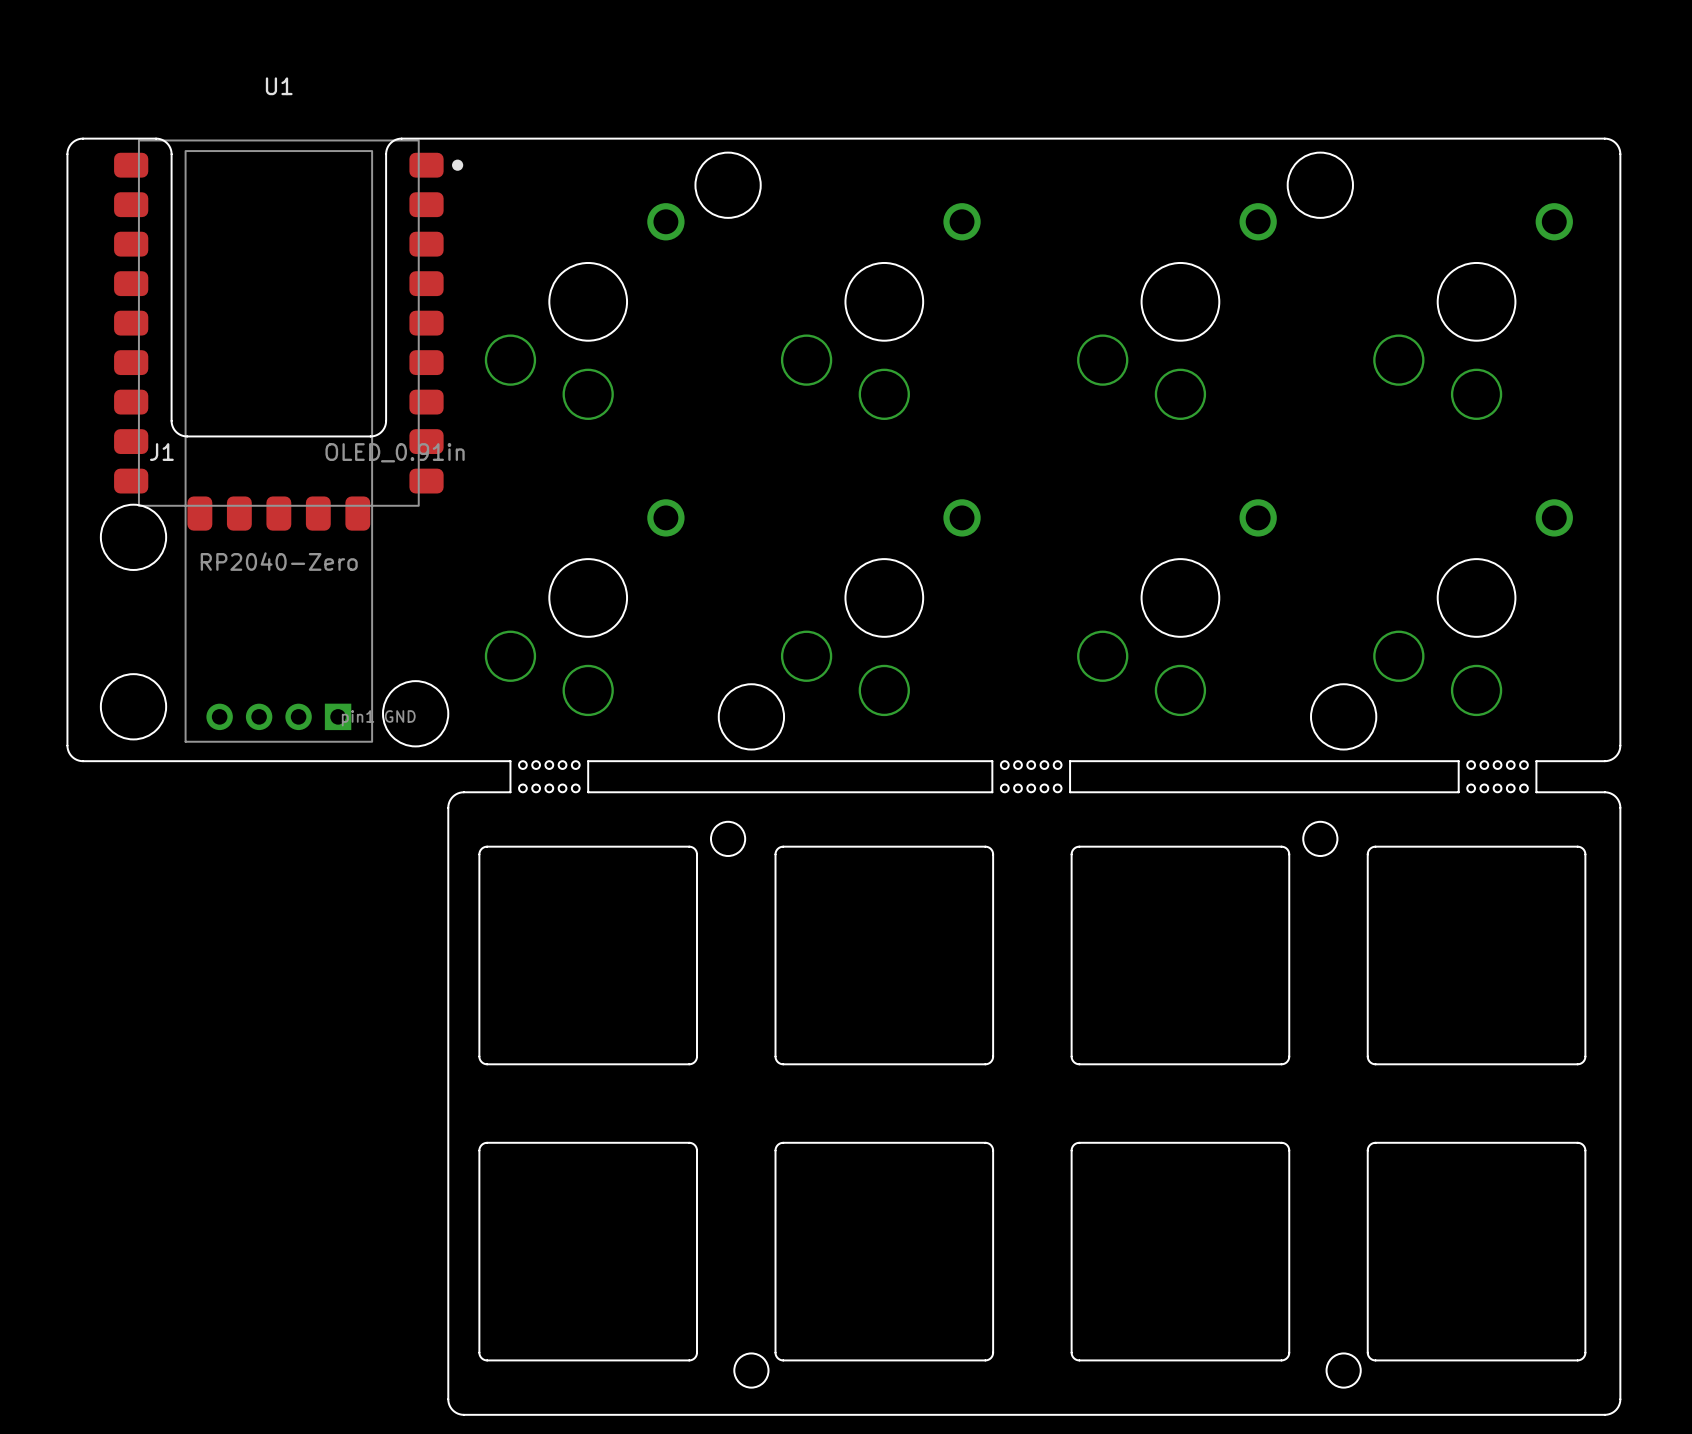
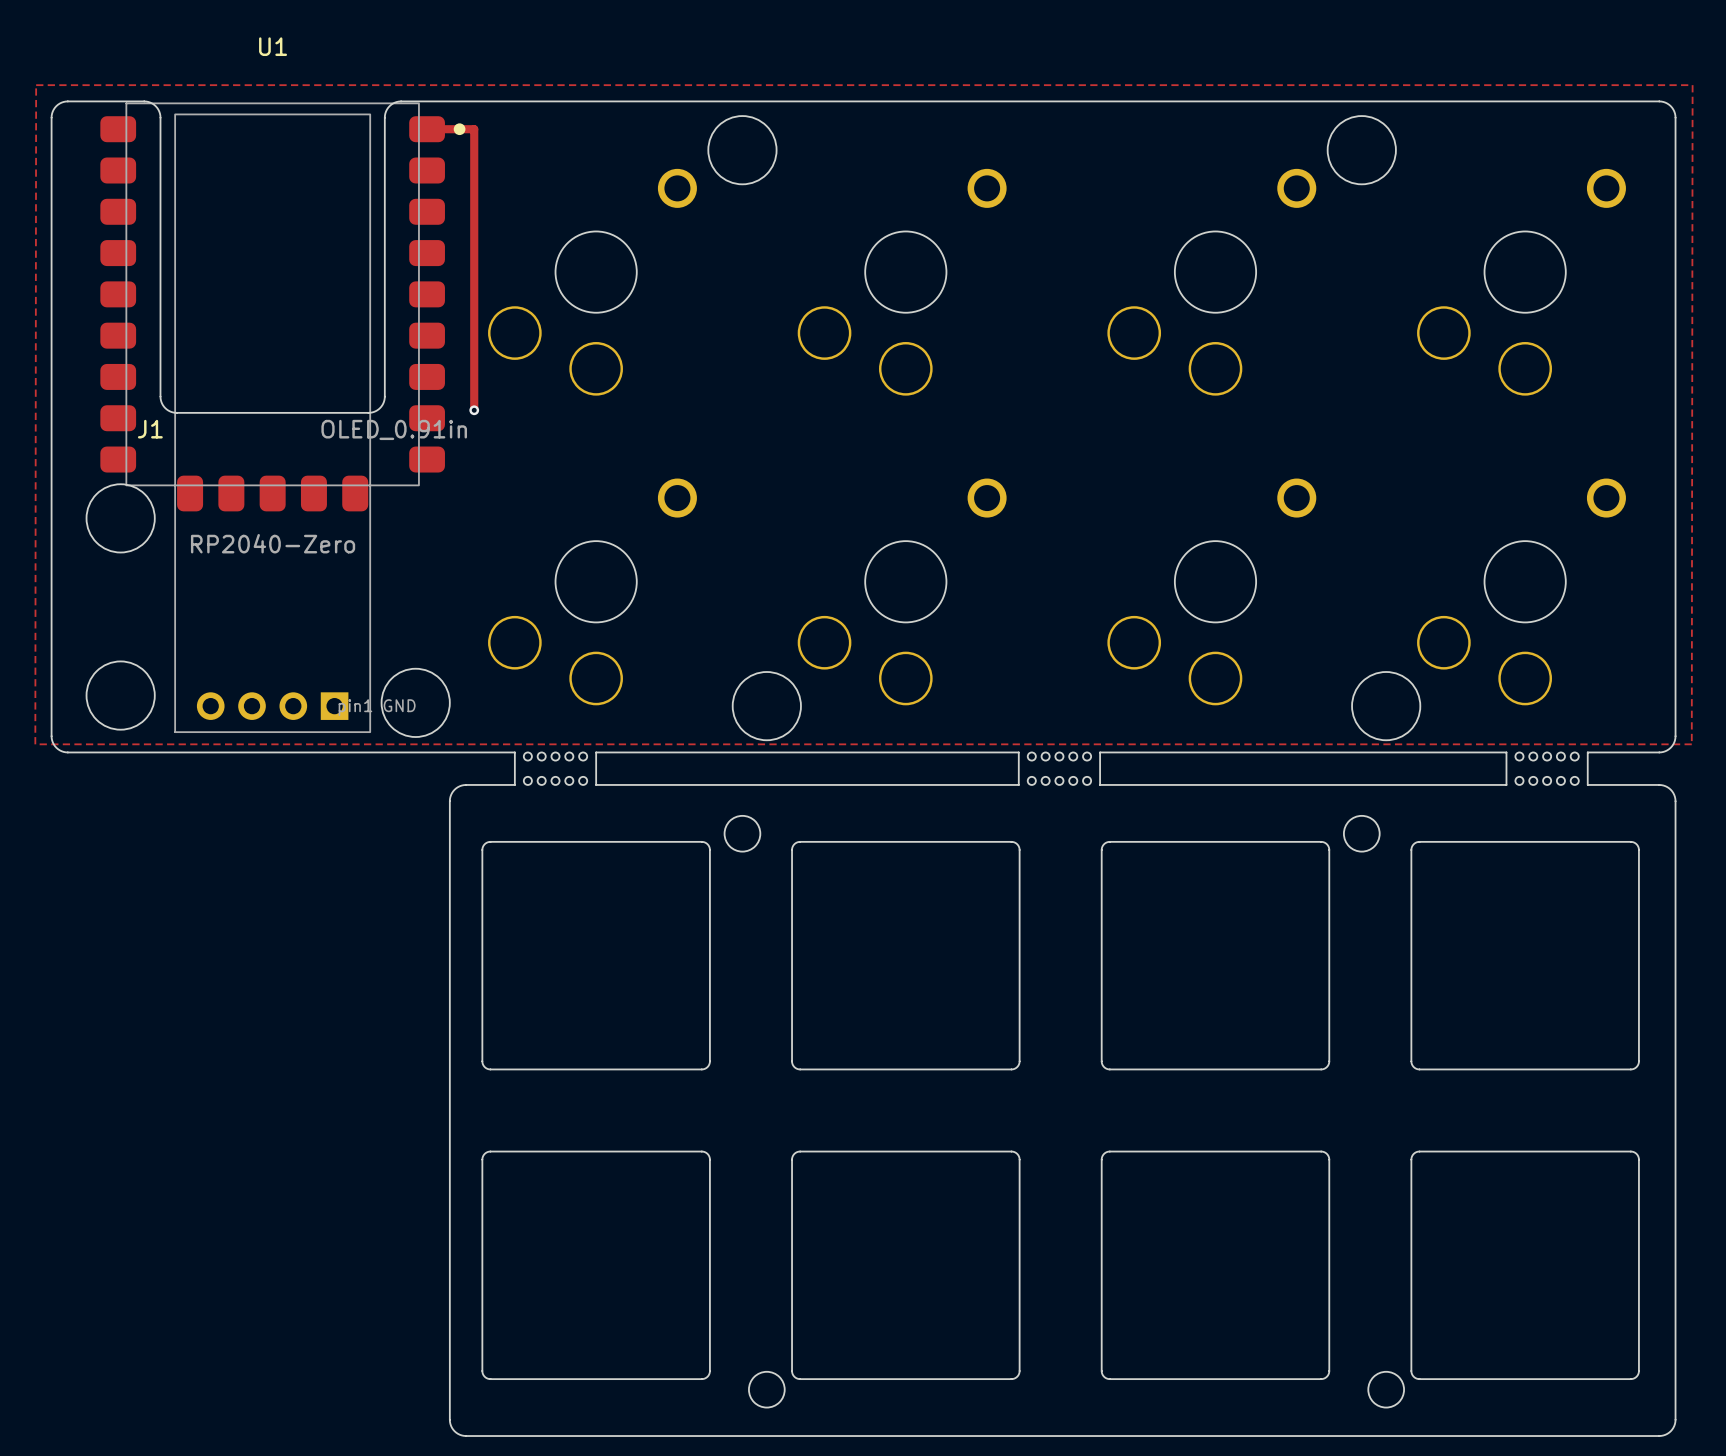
zone outline: none -> (36, 85) (1692, 85) (1691, 744) (35, 744) (36, 85)
track: none -> (427, 129) (474, 129) (474, 410)
via: none -> (474, 410)

